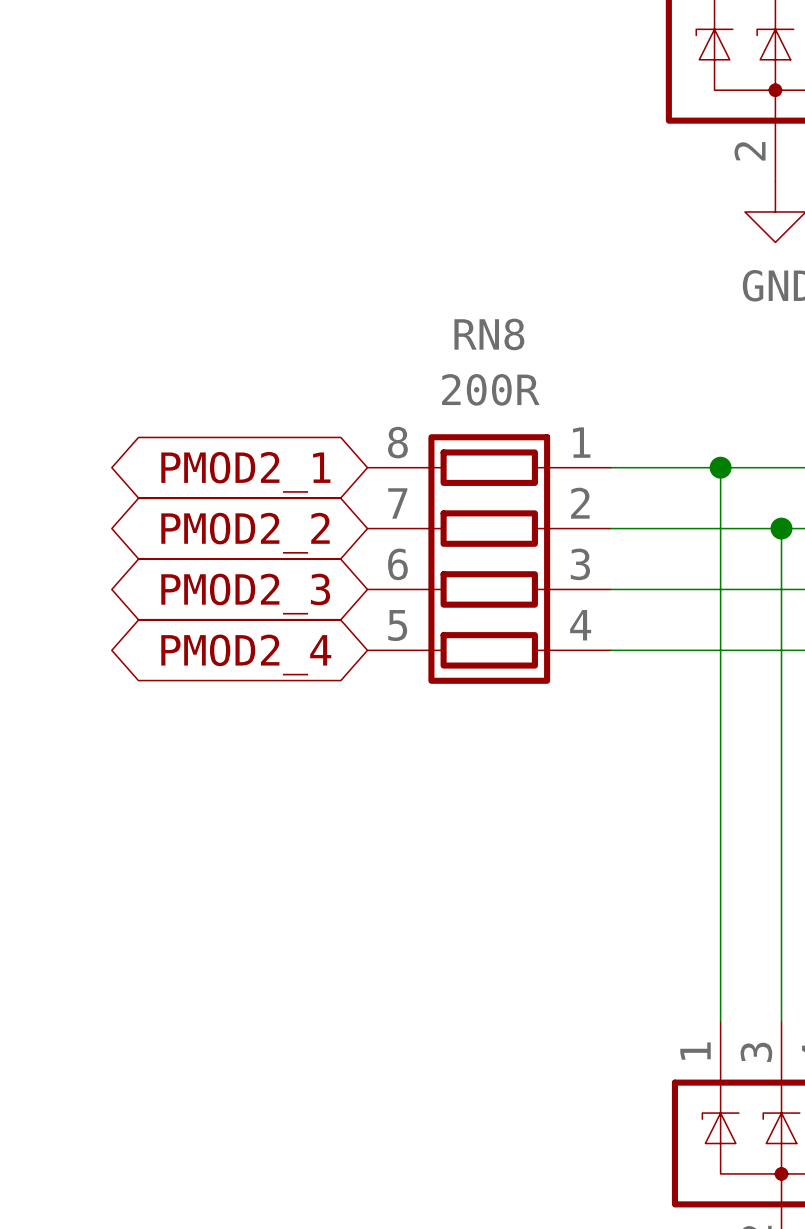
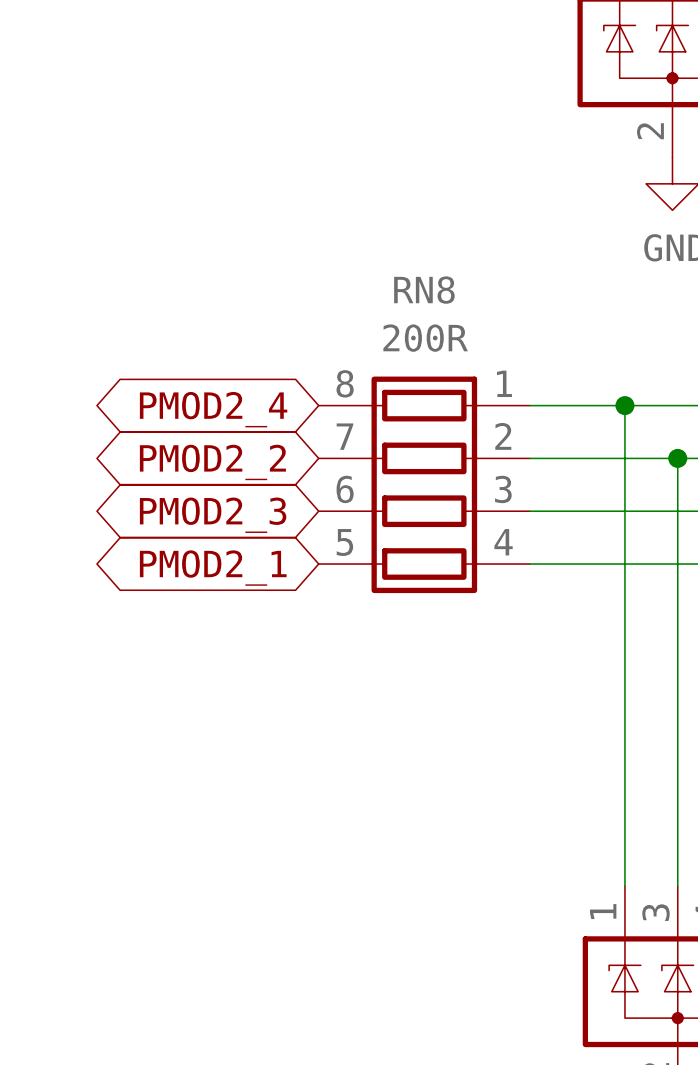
global label: PMOD2_1 (245, 472) -> PMOD2_4 (213, 409)
global label: PMOD2_4 (246, 654) -> PMOD2_1 (213, 568)

